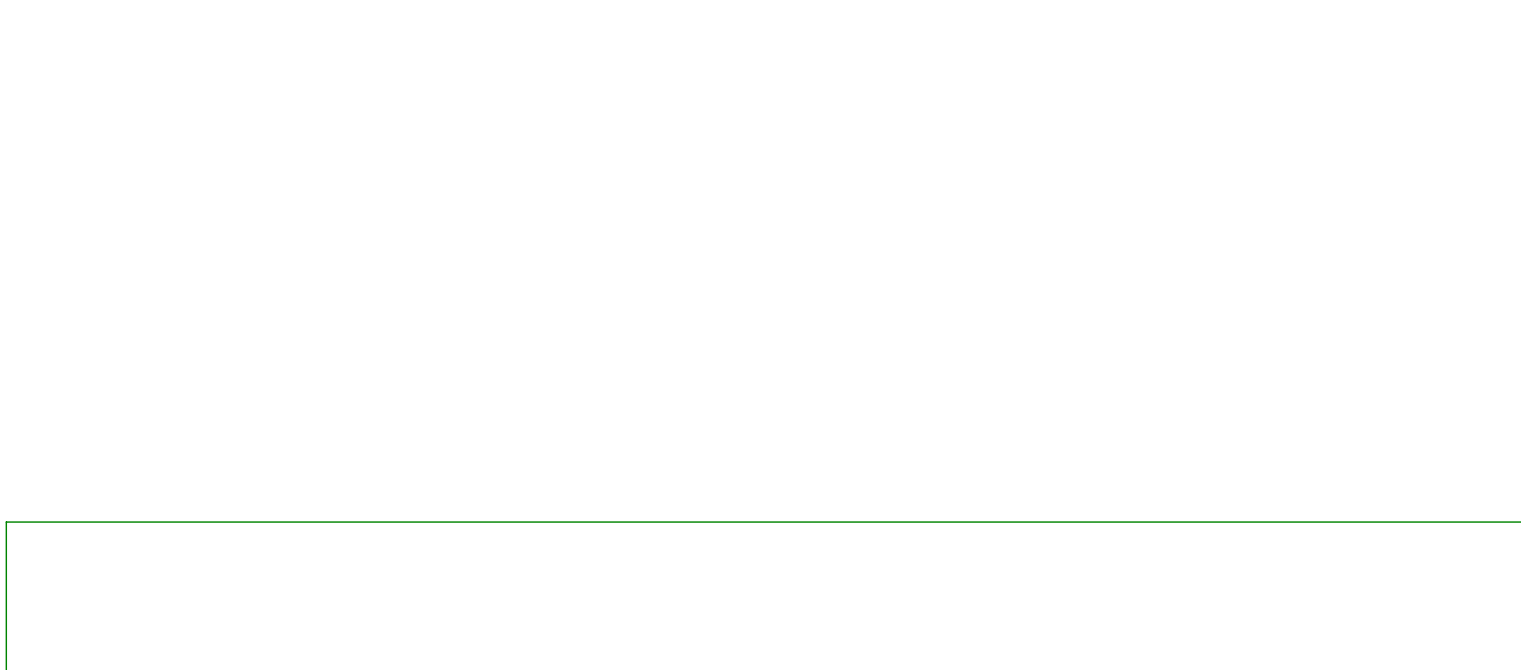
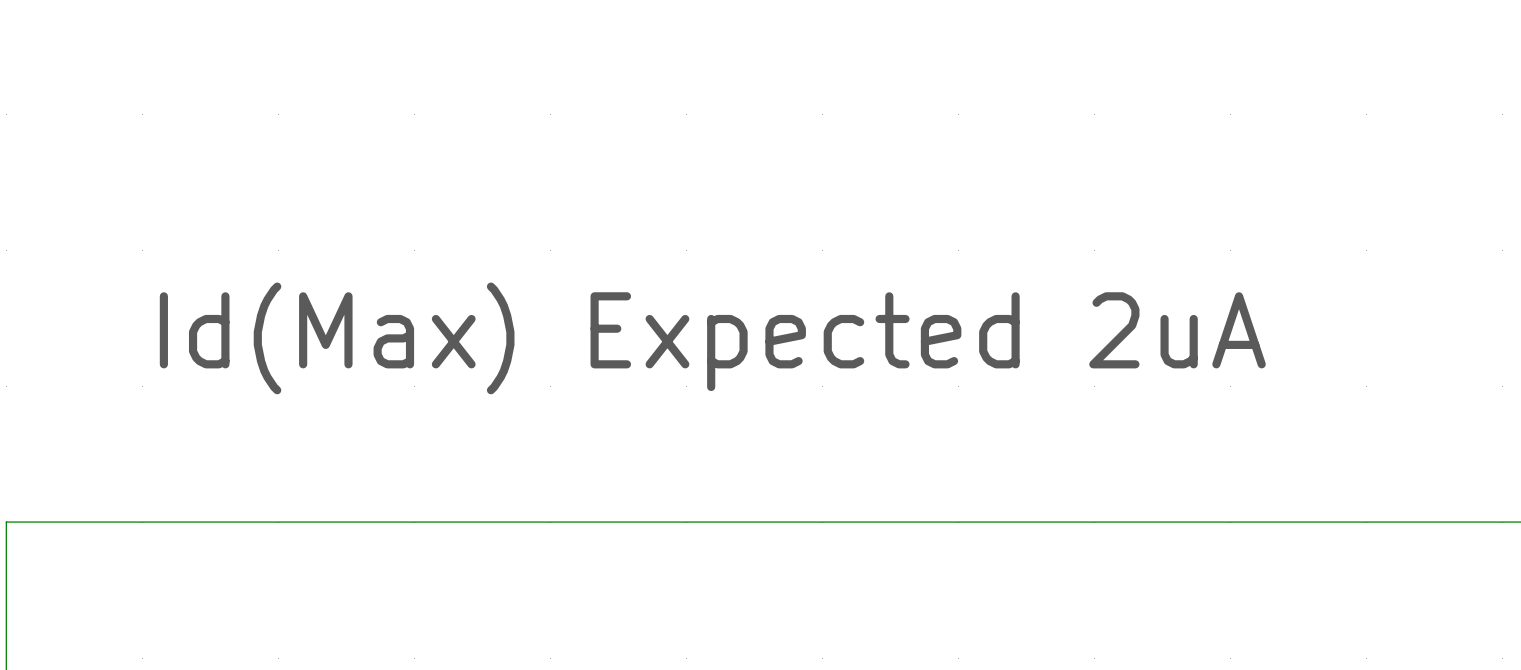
text: none -> Id(Max) Expected 2uA (712, 338)

